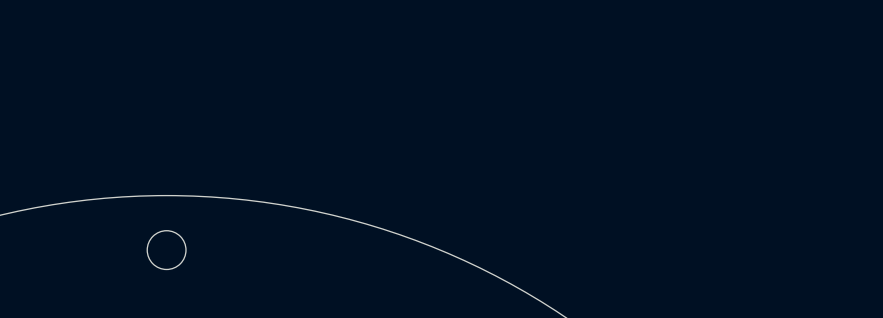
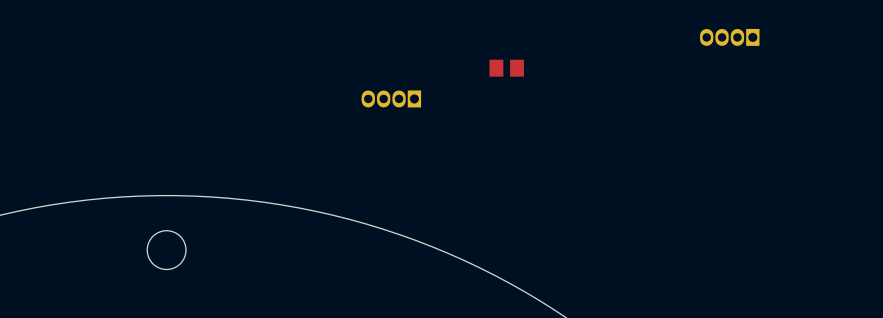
part: none -> (729, 37)
part: none -> (506, 68)
part: none -> (391, 98)

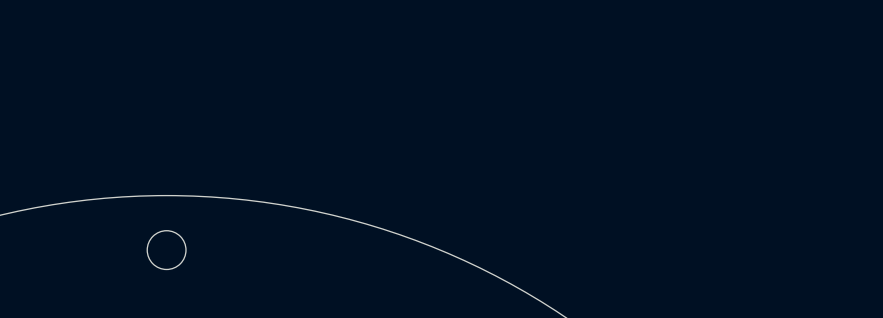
part: (729, 37) -> none
part: (506, 68) -> none
part: (391, 98) -> none

